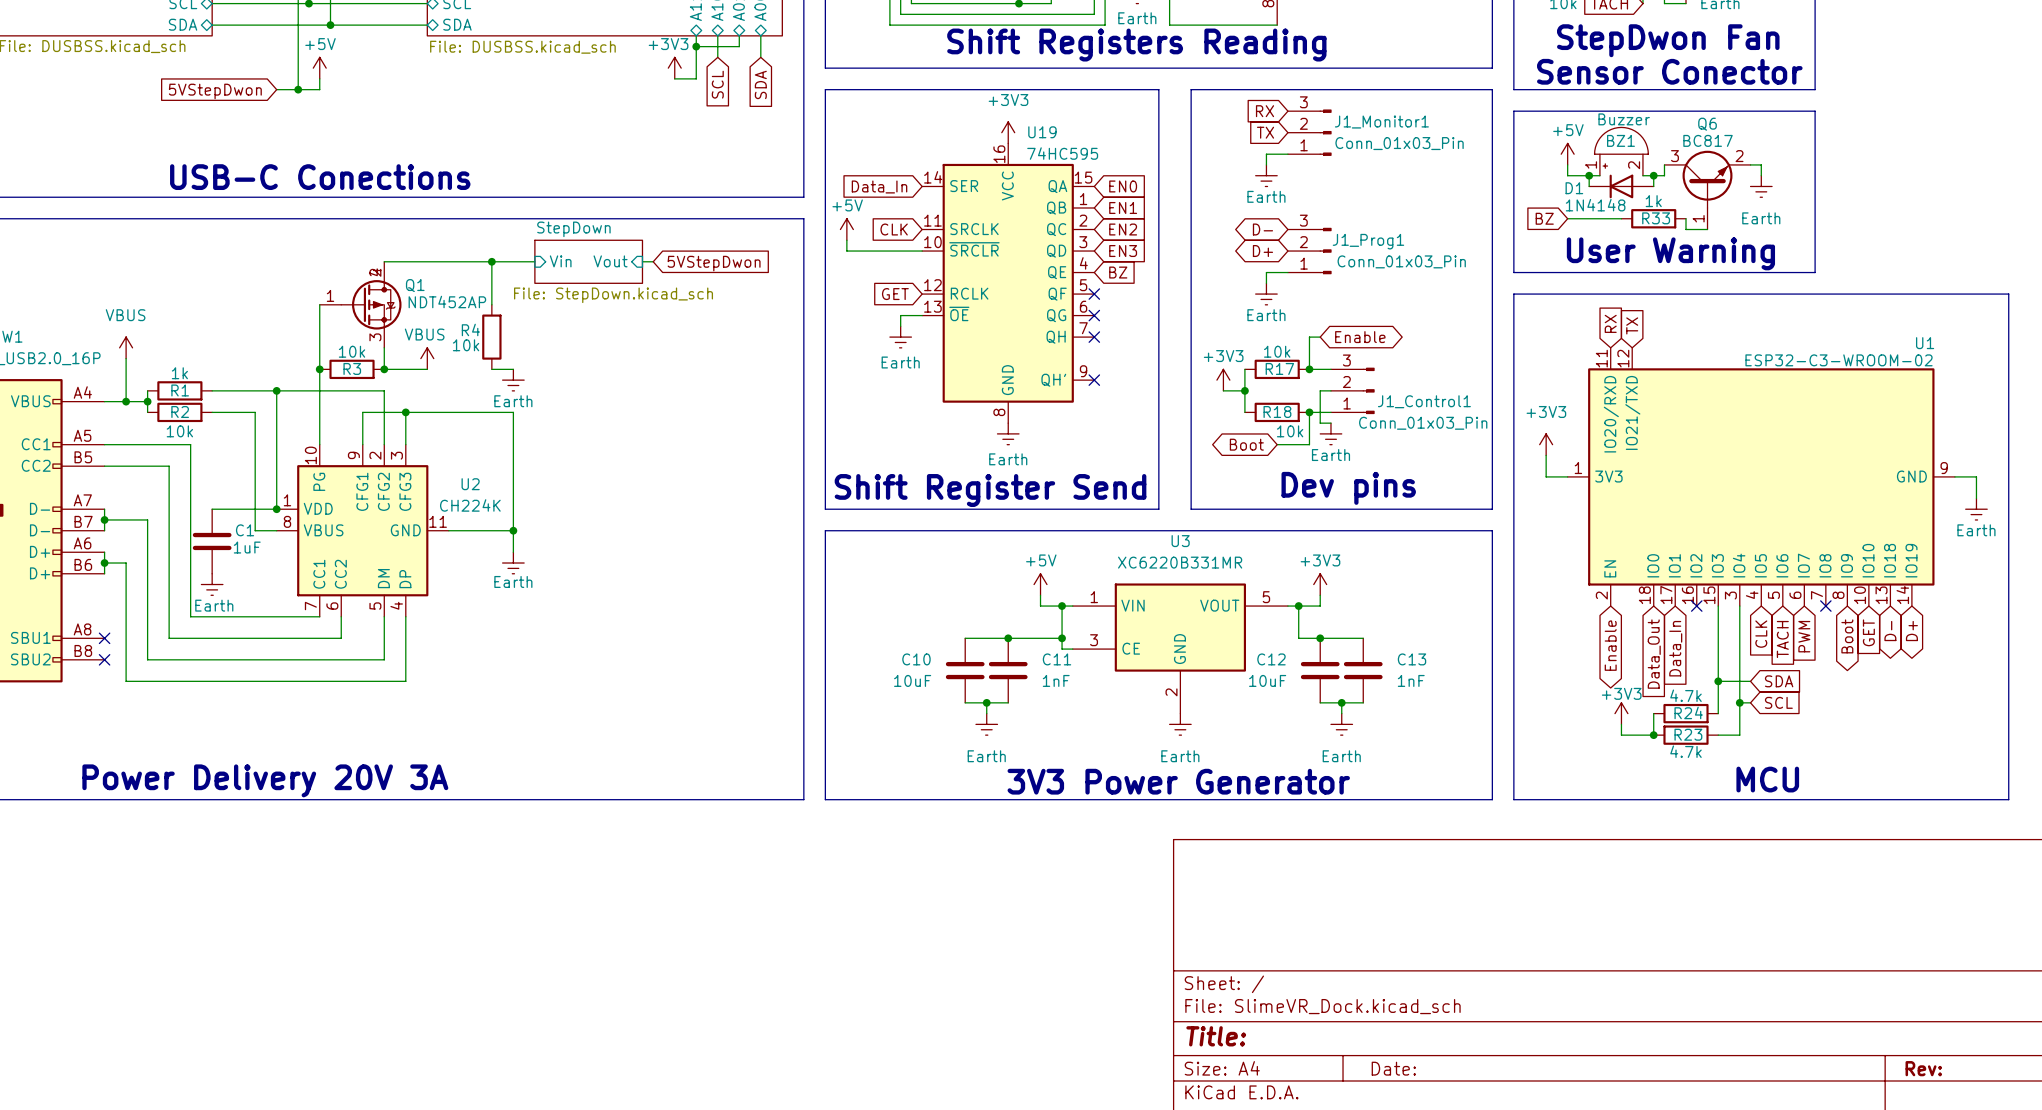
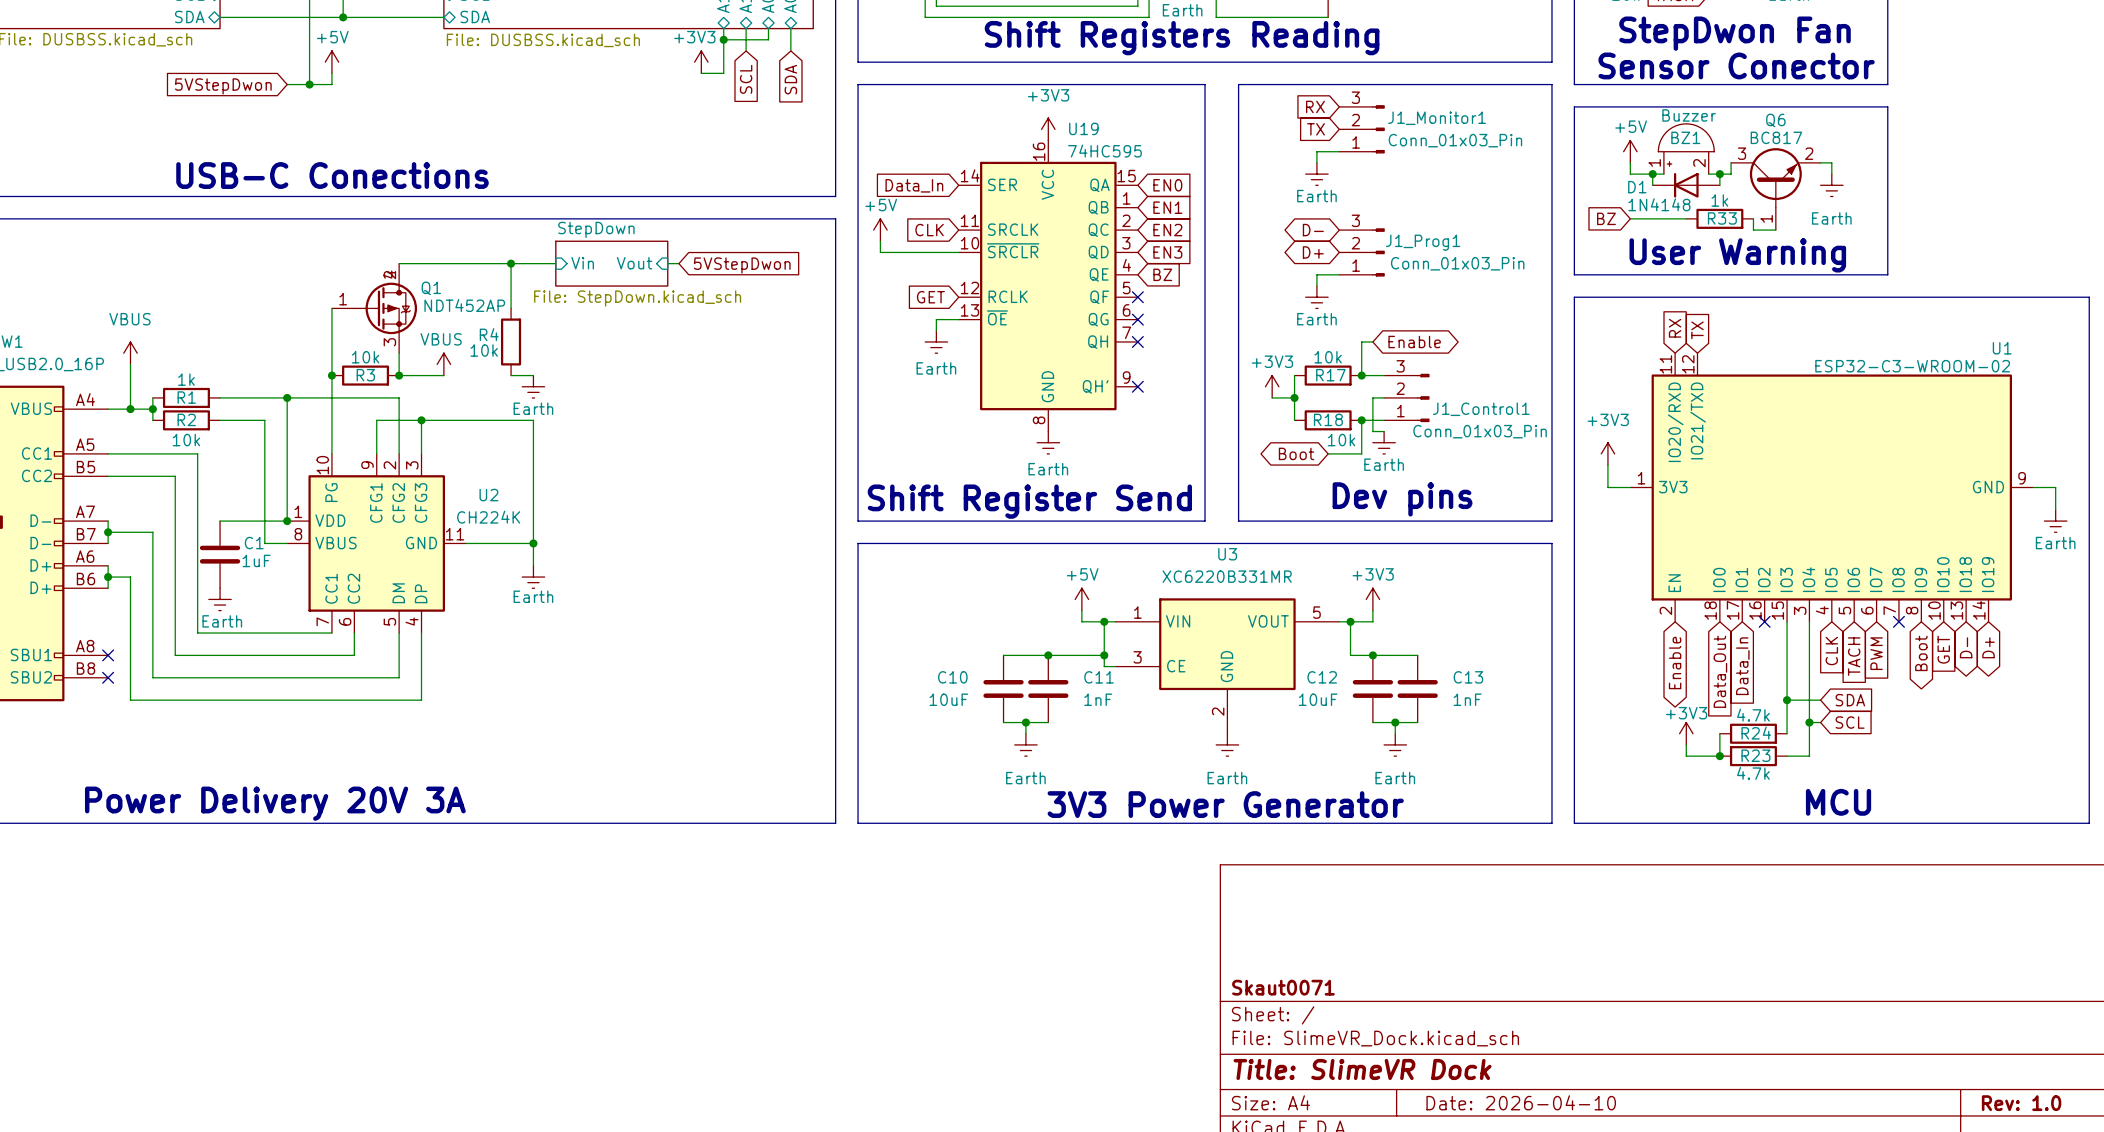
title block: none -> Skaut0071 (1283, 987)
title block: Title: (1216, 1036) -> Title: SlimeVR Dock (1362, 1069)
title block: Date: (1393, 1068) -> Date: 2026-04-10 (1521, 1102)
title block: Rev: (1923, 1068) -> Rev: 1.0 (2021, 1103)

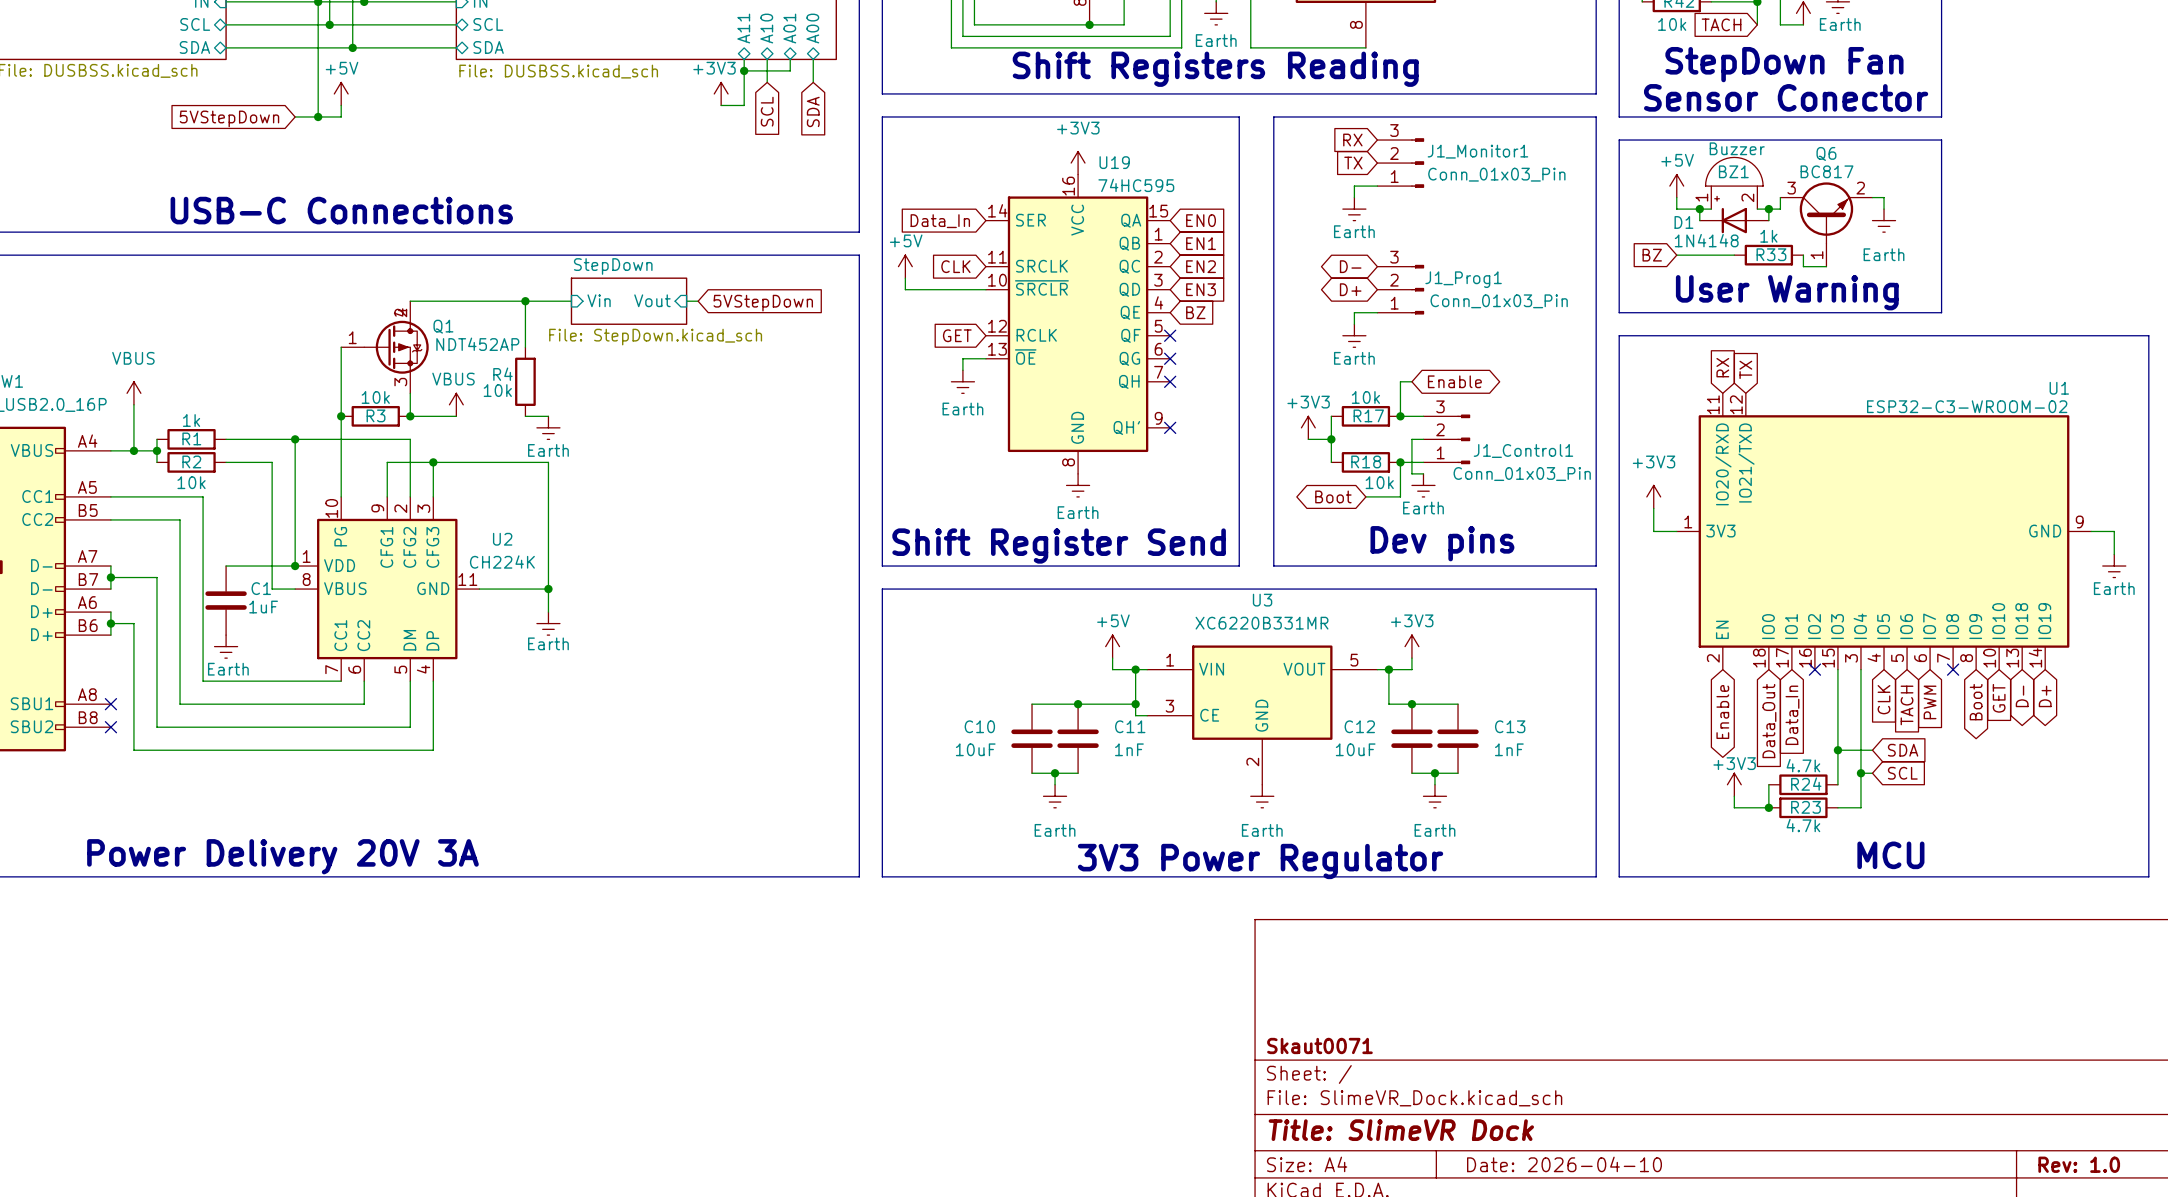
text: StepDwon Fan (1735, 33) -> StepDown Fan (1784, 64)
global label: 5VStepDwon (223, 86) -> 5VStepDown (229, 118)
text: USB-C Conections (332, 175) -> USB-C Connections (341, 210)
global label: 5VStepDwon (742, 265) -> 5VStepDown (763, 303)
text: 3V3 Power Generator (1225, 804) -> 3V3 Power Regulator (1260, 861)

